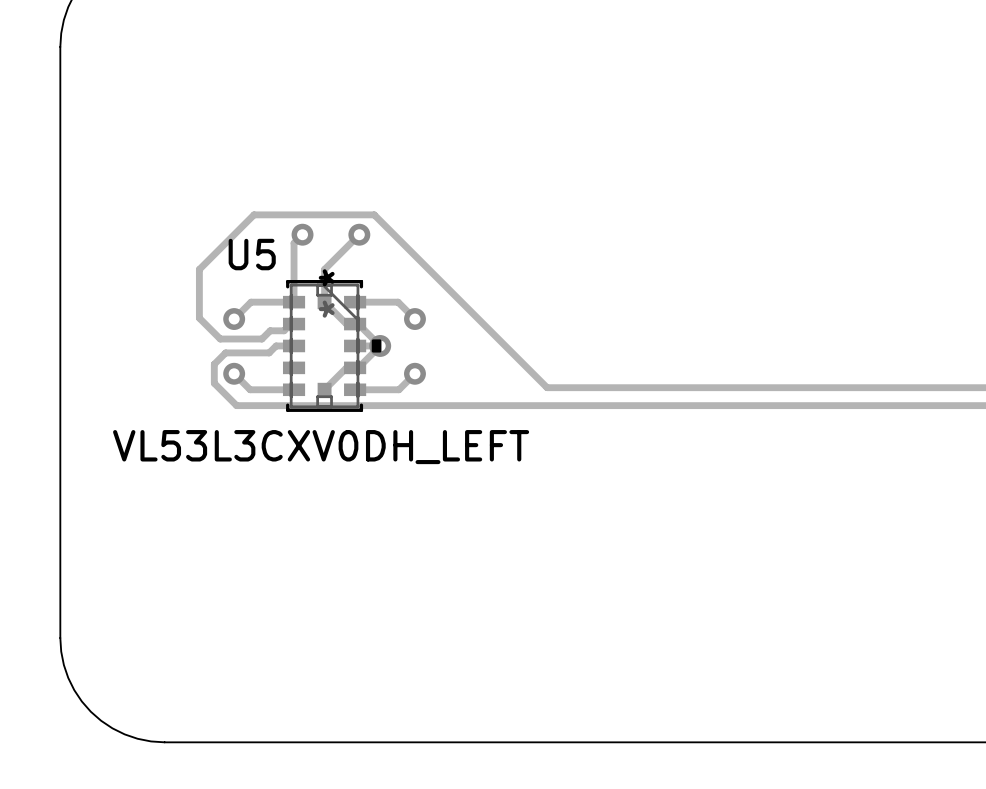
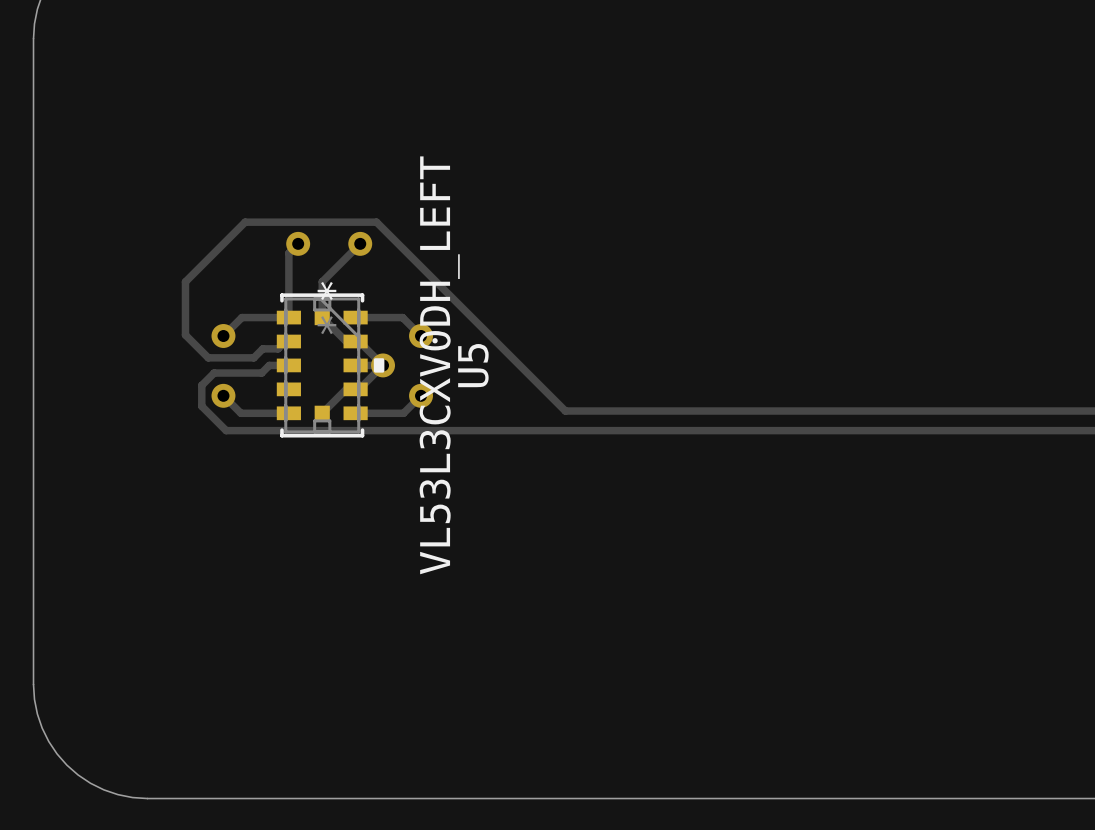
U5 name rotation: 0° (252, 254) -> 90° counterclockwise (473, 365)
U5 name position: U5 (252, 254) -> U5 (473, 365)
U5 value rotation: 0° (321, 447) -> 90° counterclockwise (439, 365)

